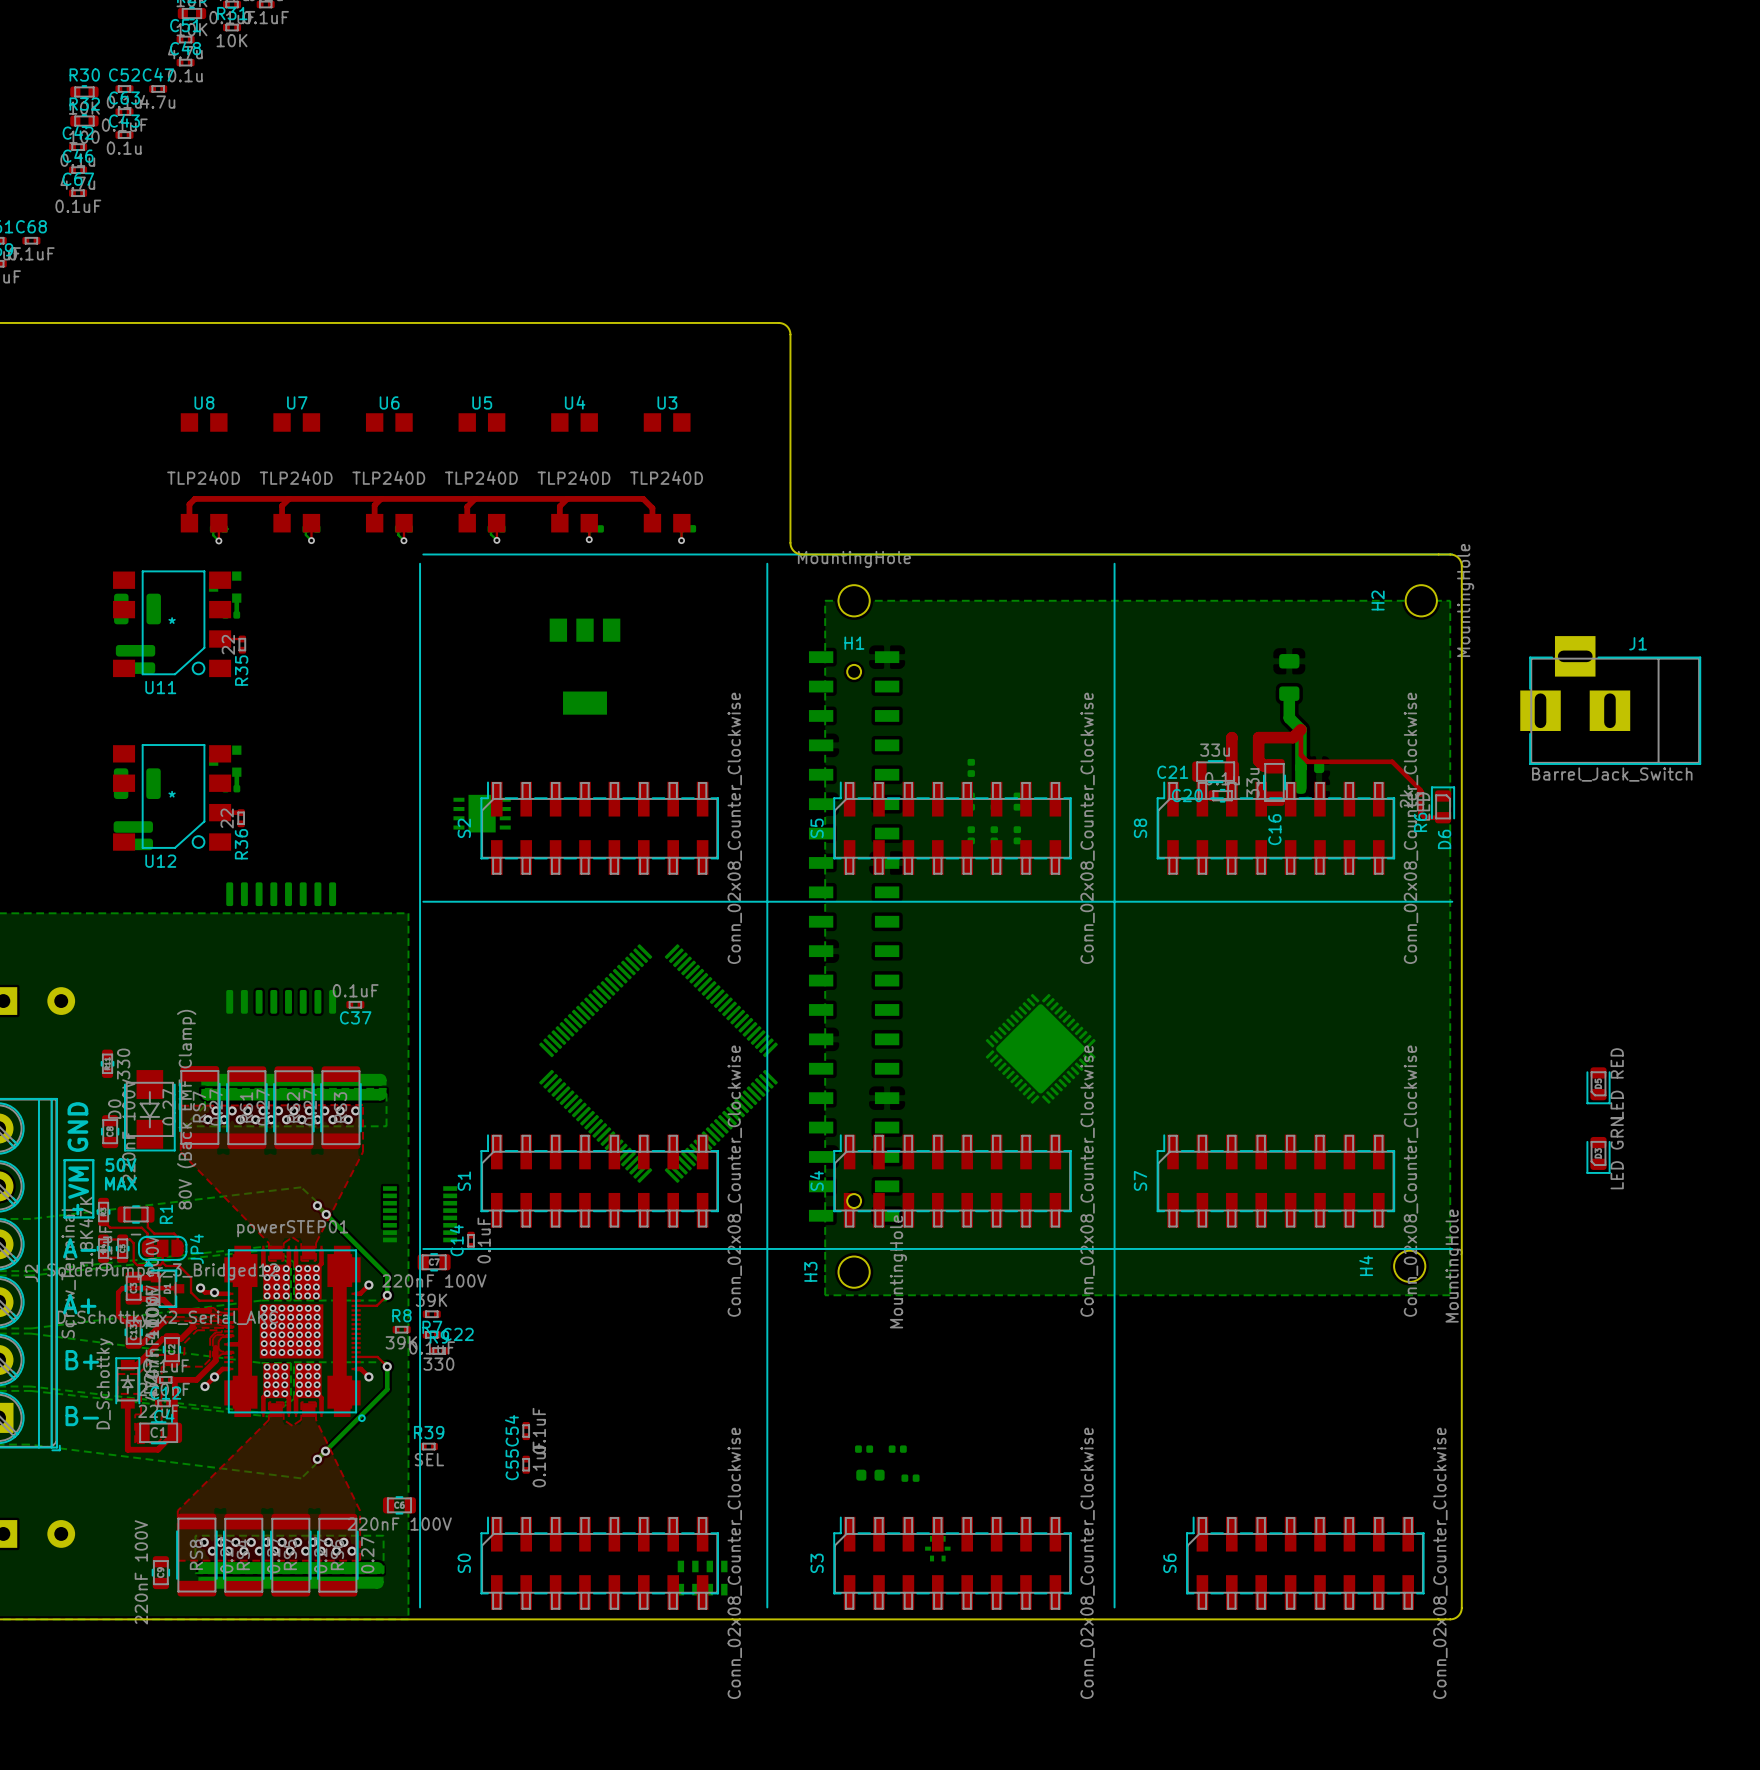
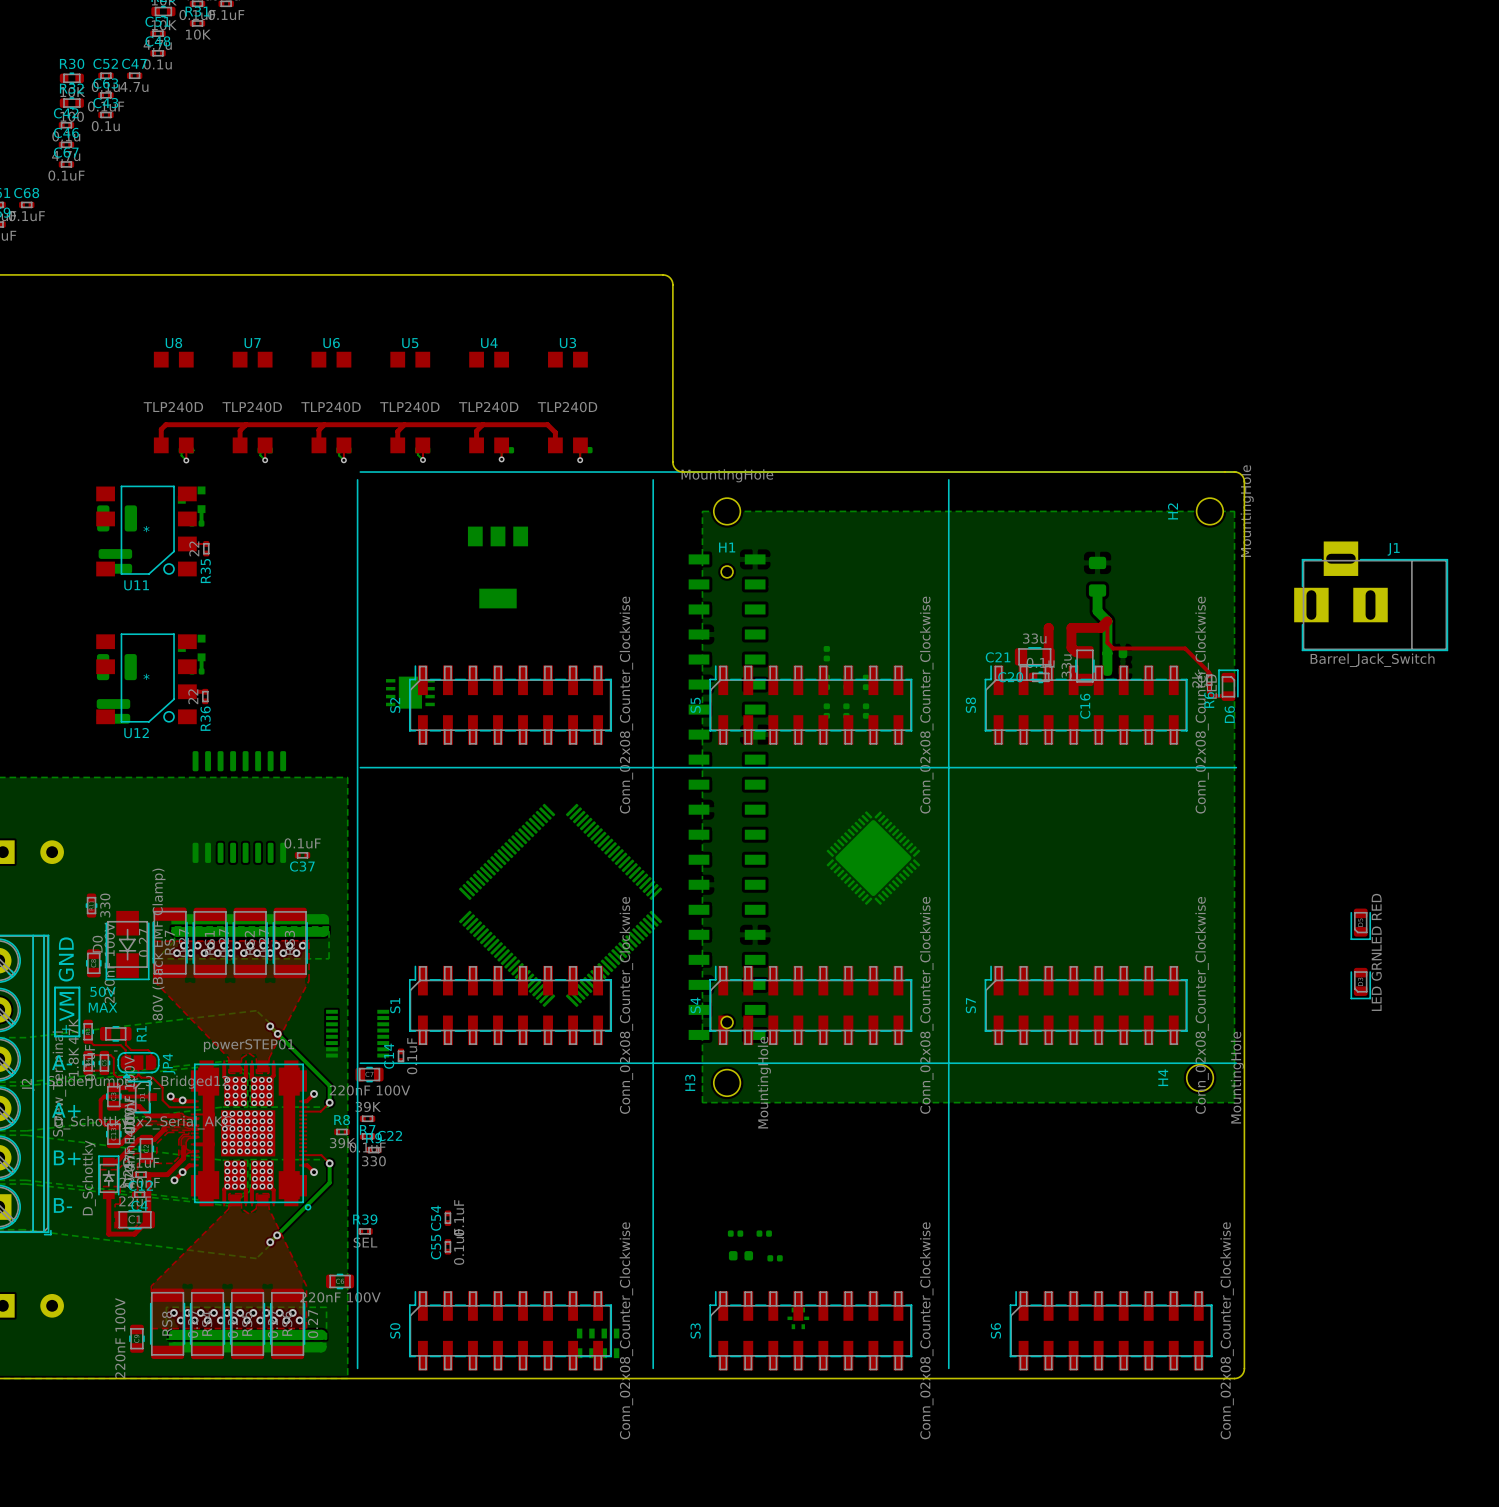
part position: (1040, 1048) -> (873, 858)

